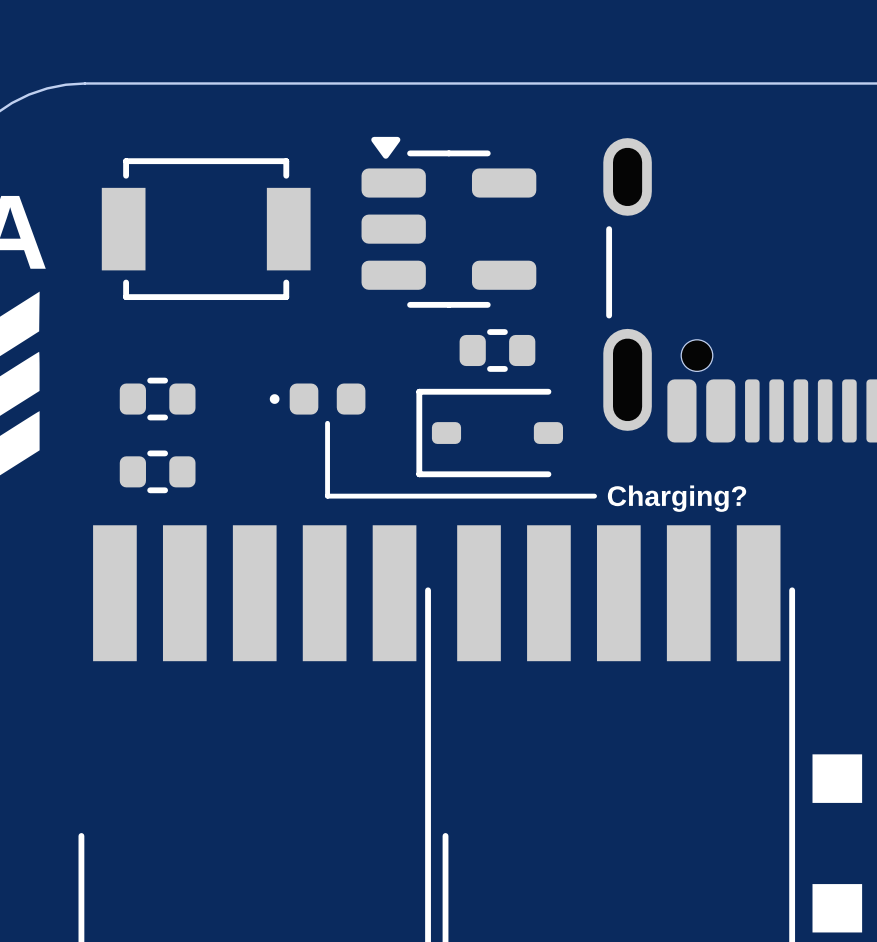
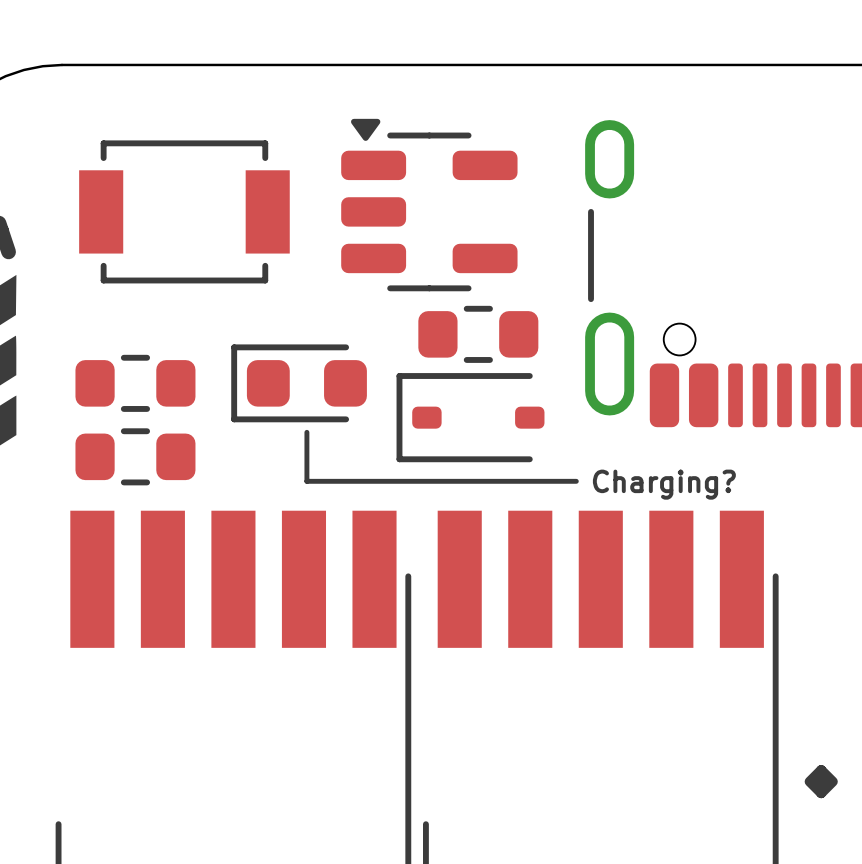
part footprint: [459, 329, 536, 372] -> [418, 305, 539, 363]
part footprint: [119, 377, 196, 421] -> [75, 354, 196, 412]
part footprint: [269, 383, 366, 415] -> [231, 344, 367, 423]
line: (327, 423) (327, 447) -> none
part footprint: [119, 450, 196, 494] -> [75, 428, 196, 486]

